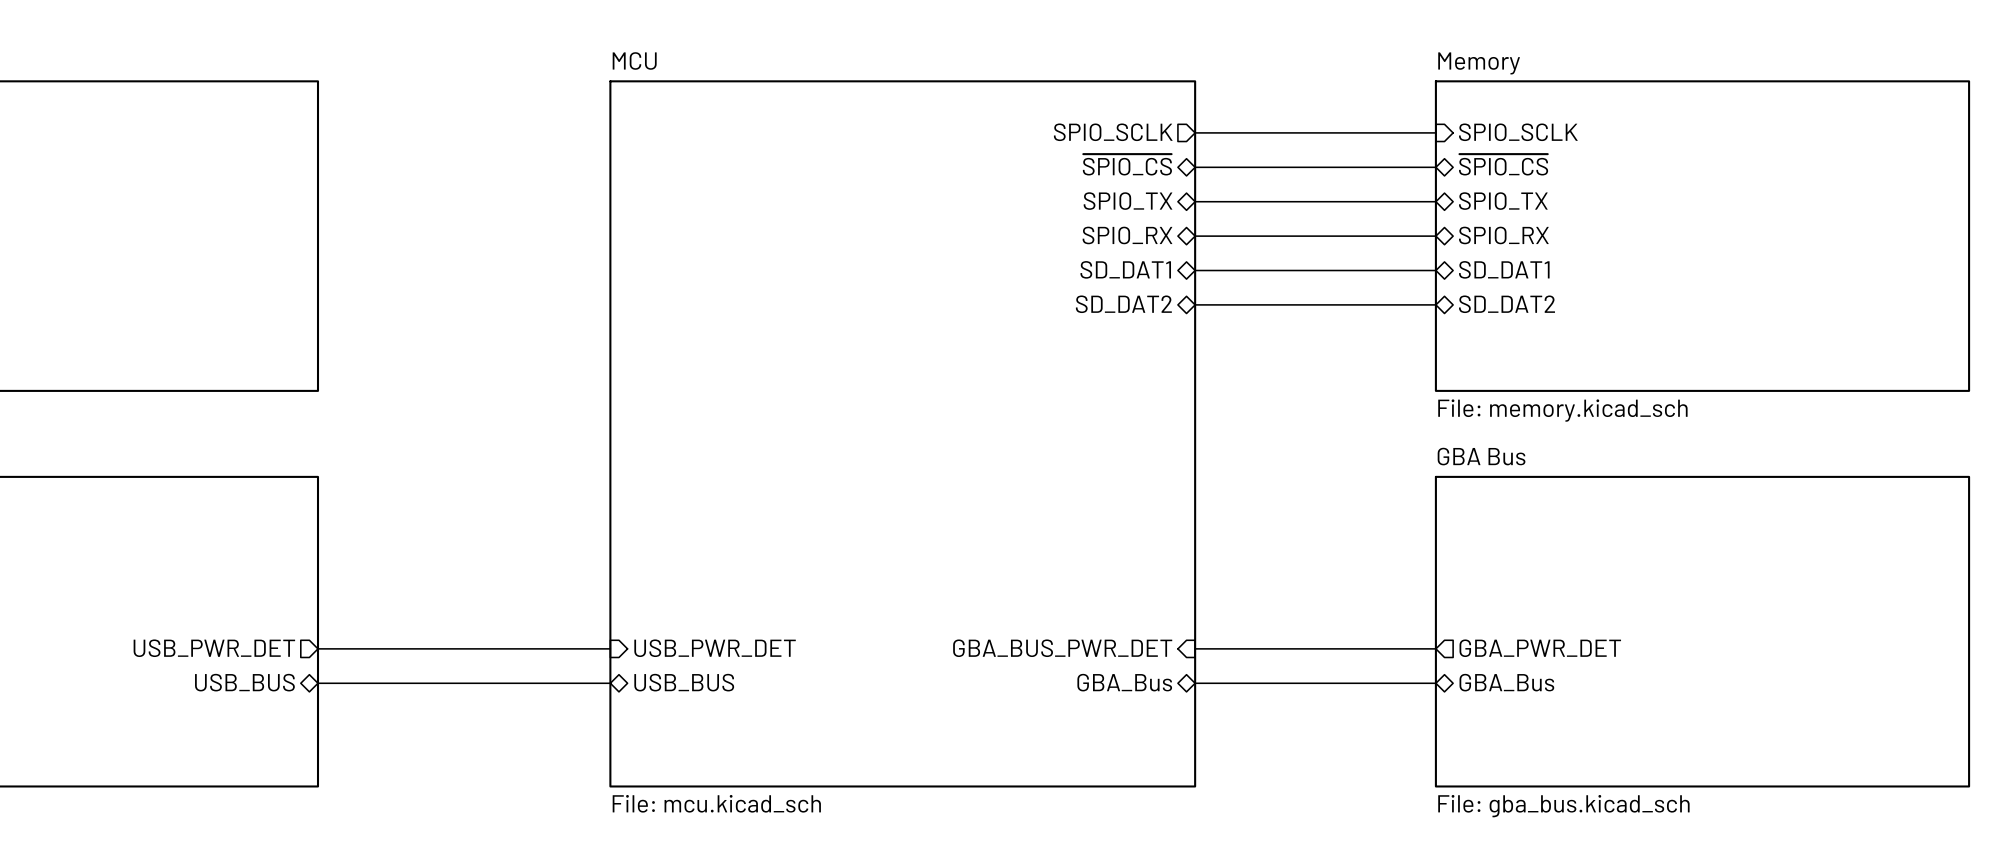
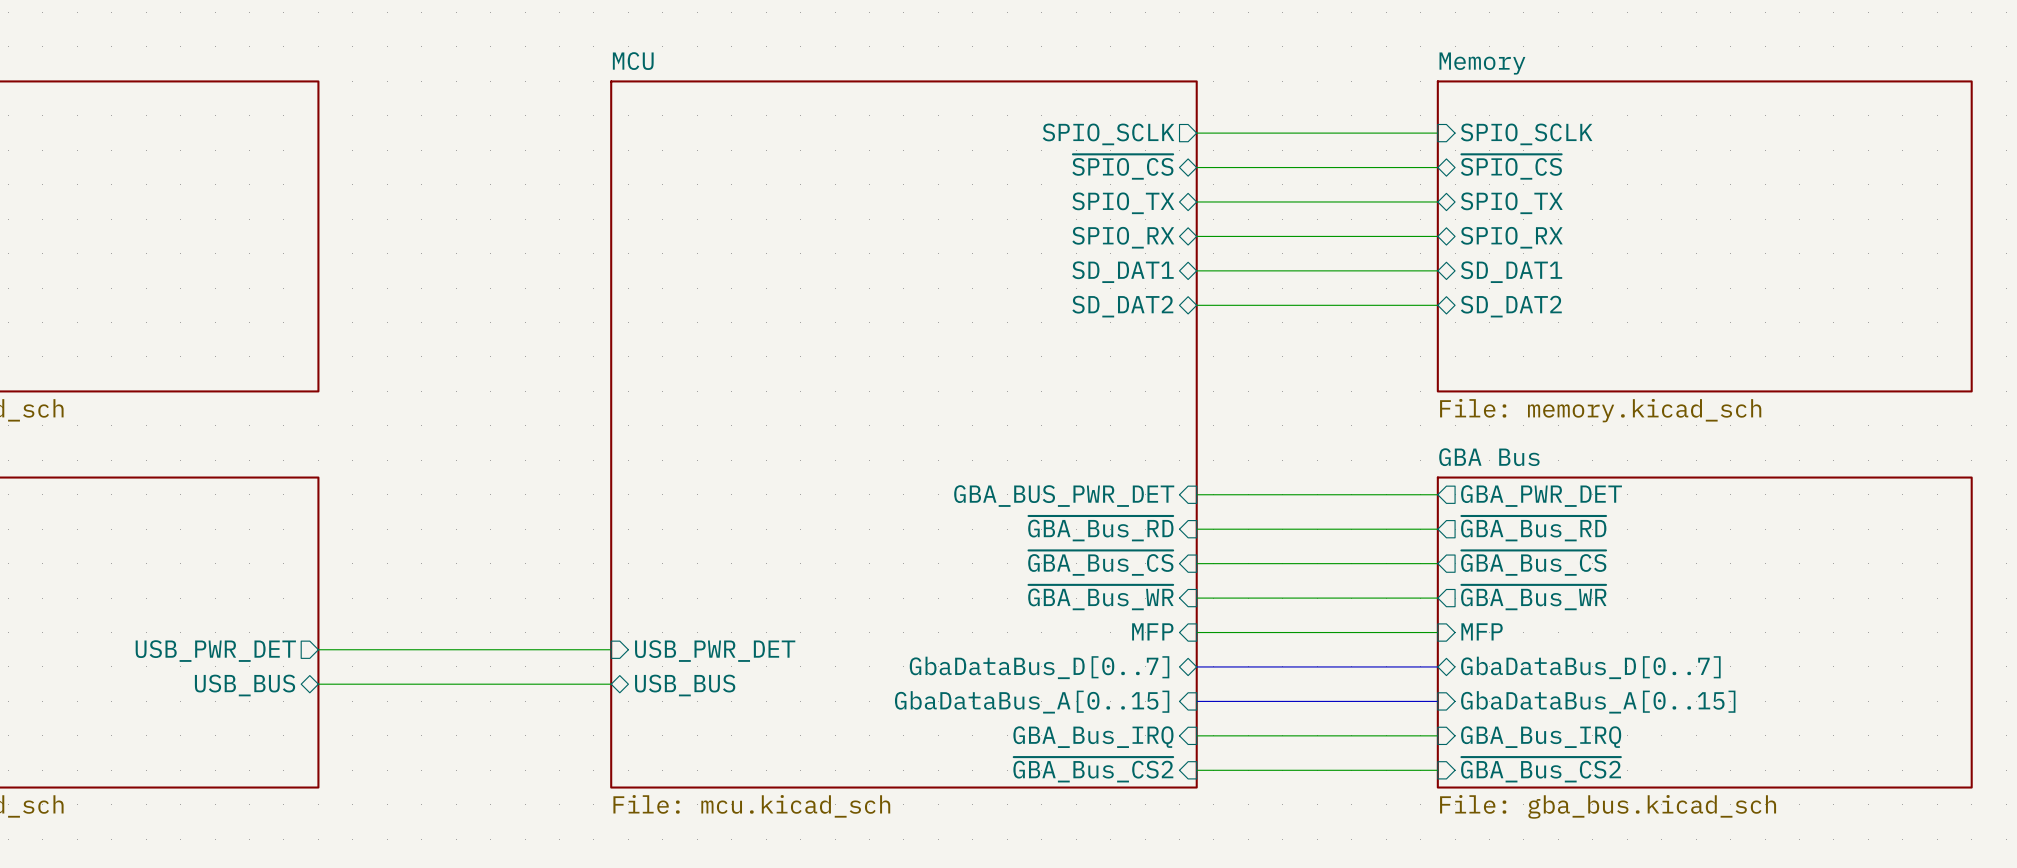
wire: none -> (1196, 494) (1437, 494)
sheet pin: none -> ~{GBA_Bus_RD} (1100, 528)
sheet pin: none -> ~{GBA_Bus_RD} (1533, 528)
wire: none -> (1196, 529) (1437, 529)
sheet pin: none -> ~{GBA_Bus_CS} (1100, 563)
sheet pin: none -> ~{GBA_Bus_CS} (1533, 563)
wire: none -> (1196, 563) (1437, 563)
sheet pin: none -> ~{GBA_Bus_WR} (1100, 597)
sheet pin: none -> ~{GBA_Bus_WR} (1533, 597)
sheet pin: none -> MFP (1152, 631)
sheet pin: none -> MFP (1482, 631)
sheet pin position: GBA_BUS_PWR_DET (1062, 648) -> GBA_BUS_PWR_DET (1064, 496)
wire: (1195, 648) (1435, 648) -> (1196, 598) (1437, 598)
sheet pin position: GBA_PWR_DET (1540, 648) -> GBA_PWR_DET (1541, 496)
sheet pin: none -> GbaDataBus_D[0..7] (1039, 667)
bus: none -> (1196, 666) (1437, 666)
sheet pin: none -> GbaDataBus_D[0..7] (1590, 667)
sheet pin: GBA_Bus (1124, 682) -> none
sheet pin: GBA_Bus (1506, 682) -> none
wire: (1195, 683) (1435, 683) -> (1196, 632) (1437, 632)
sheet pin: none -> GbaDataBus_A[0..15] (1032, 702)
bus: none -> (1196, 701) (1437, 701)
sheet pin: none -> GbaDataBus_A[0..15] (1598, 702)
wire: none -> (1196, 735) (1437, 735)
sheet pin: none -> GBA_Bus_IRQ (1093, 737)
sheet pin: none -> GBA_Bus_IRQ (1541, 737)
sheet pin: none -> ~{GBA_Bus_CS2} (1093, 769)
sheet pin: none -> ~{GBA_Bus_CS2} (1541, 769)
wire: none -> (1196, 770) (1437, 770)

